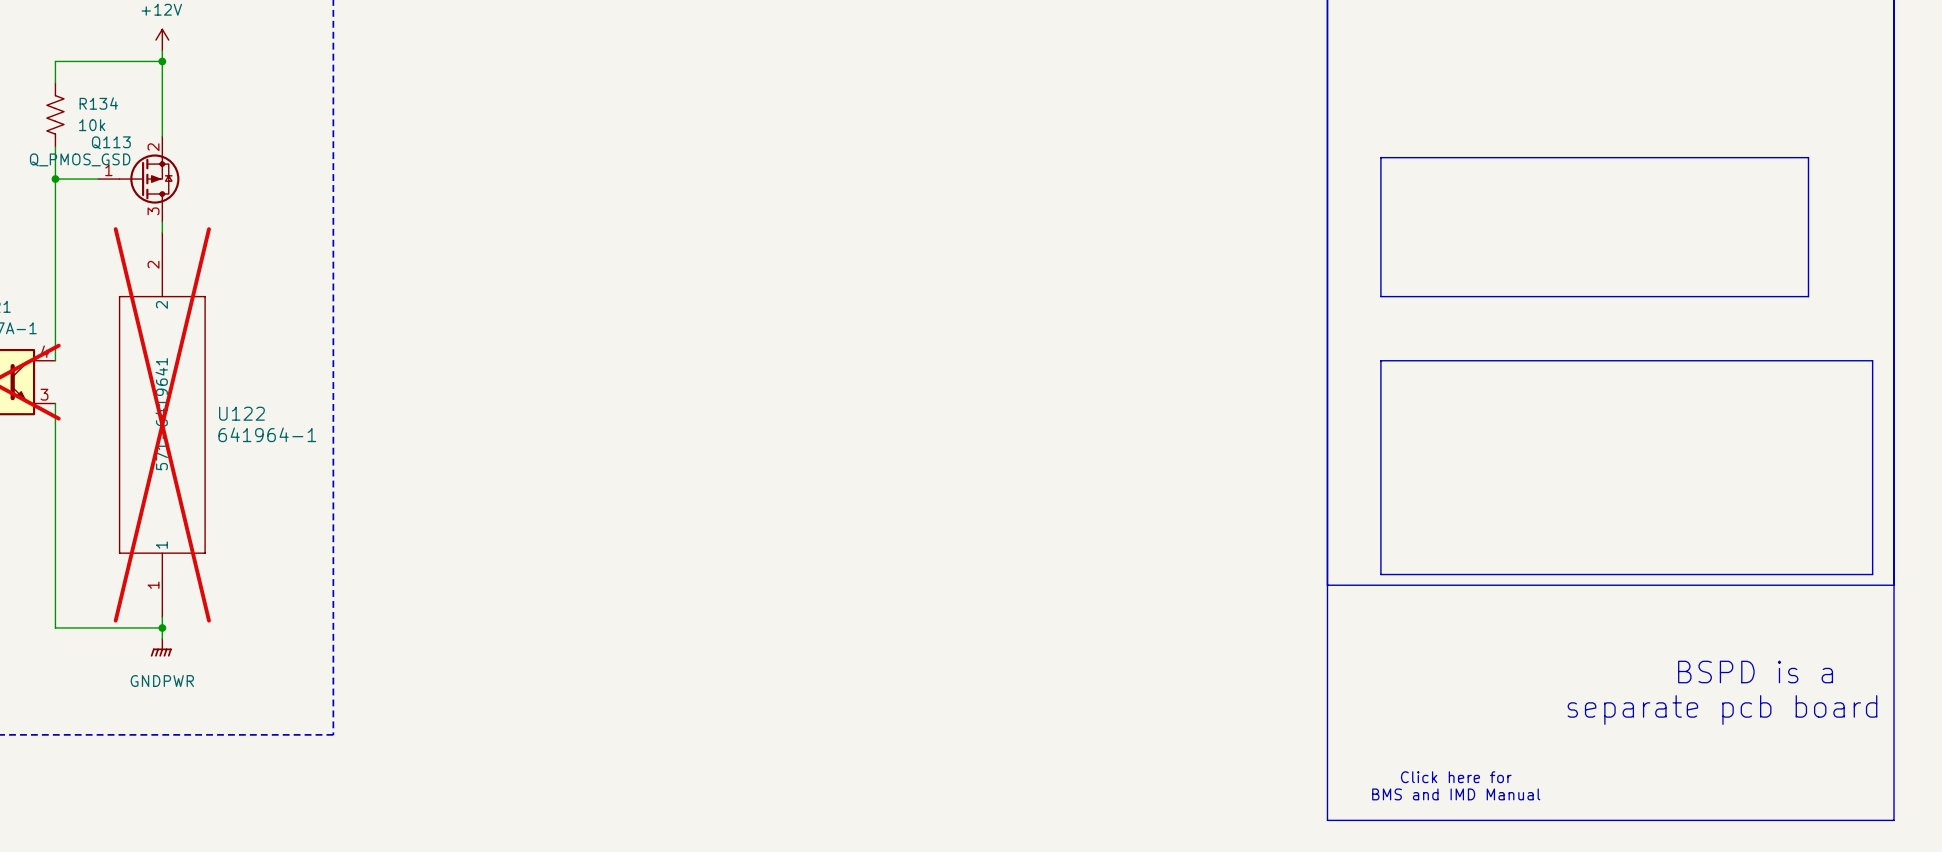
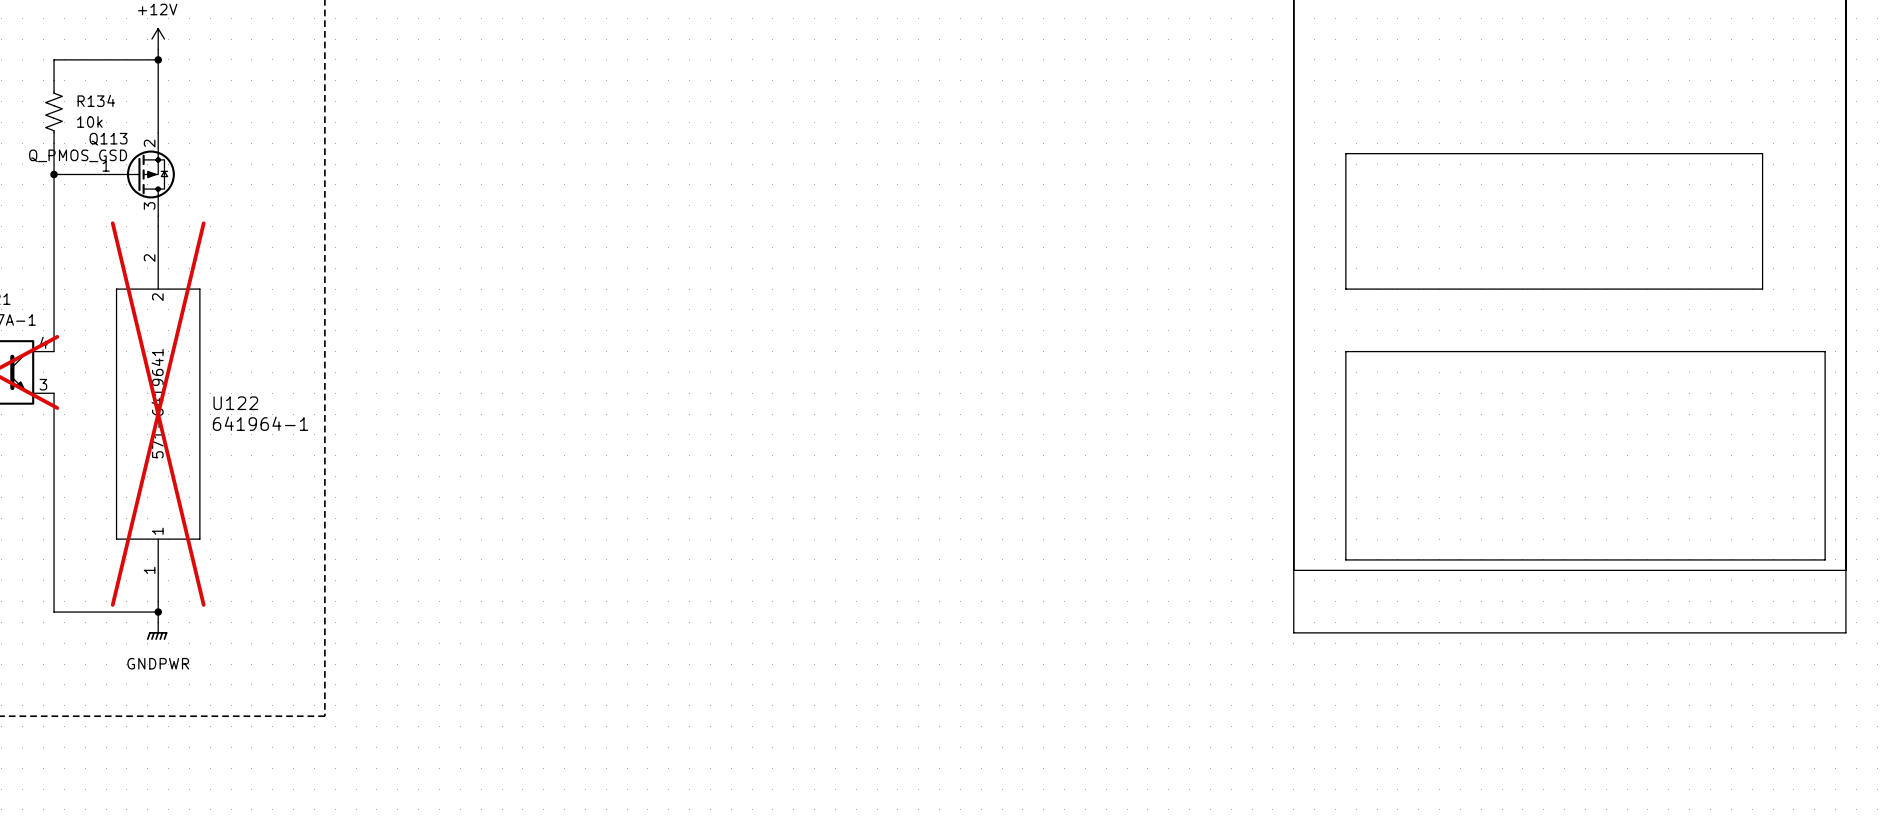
line: (1327, 649) (1327, 820) (1894, 820) (1894, 649) -> (1293, 632) (1845, 632)
text: BSPD is a (1755, 672) -> none
text: separate pcb board (1722, 709) -> none
text: Click here for (1456, 777) -> none
text: BMS and IMD Manual (1456, 794) -> none

